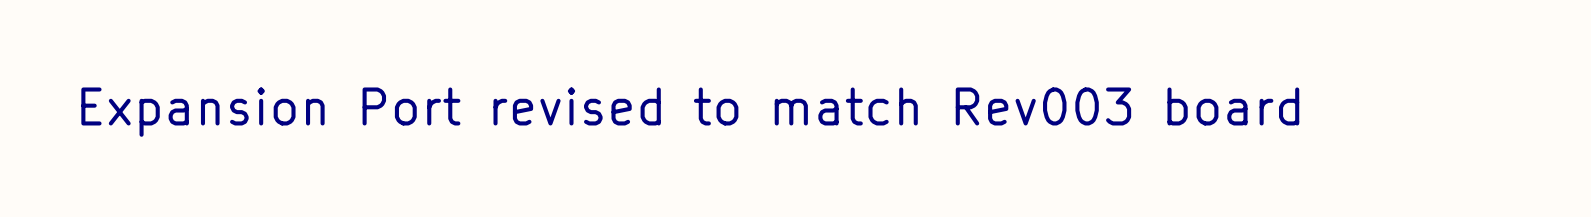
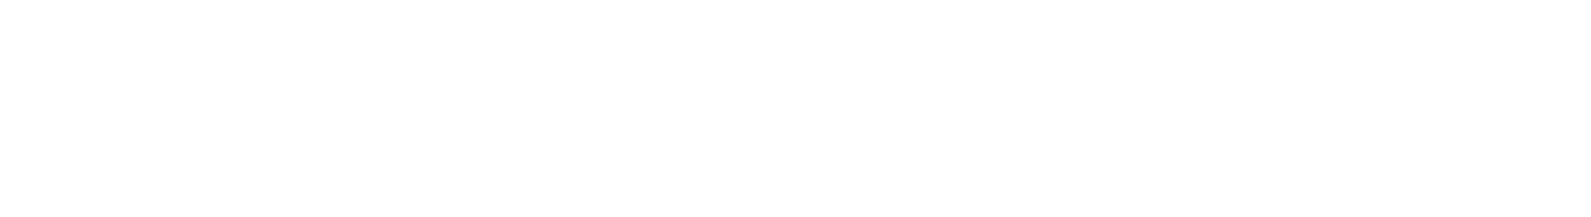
text: Expansion Port revised to match Rev003 board (690, 112) -> none

